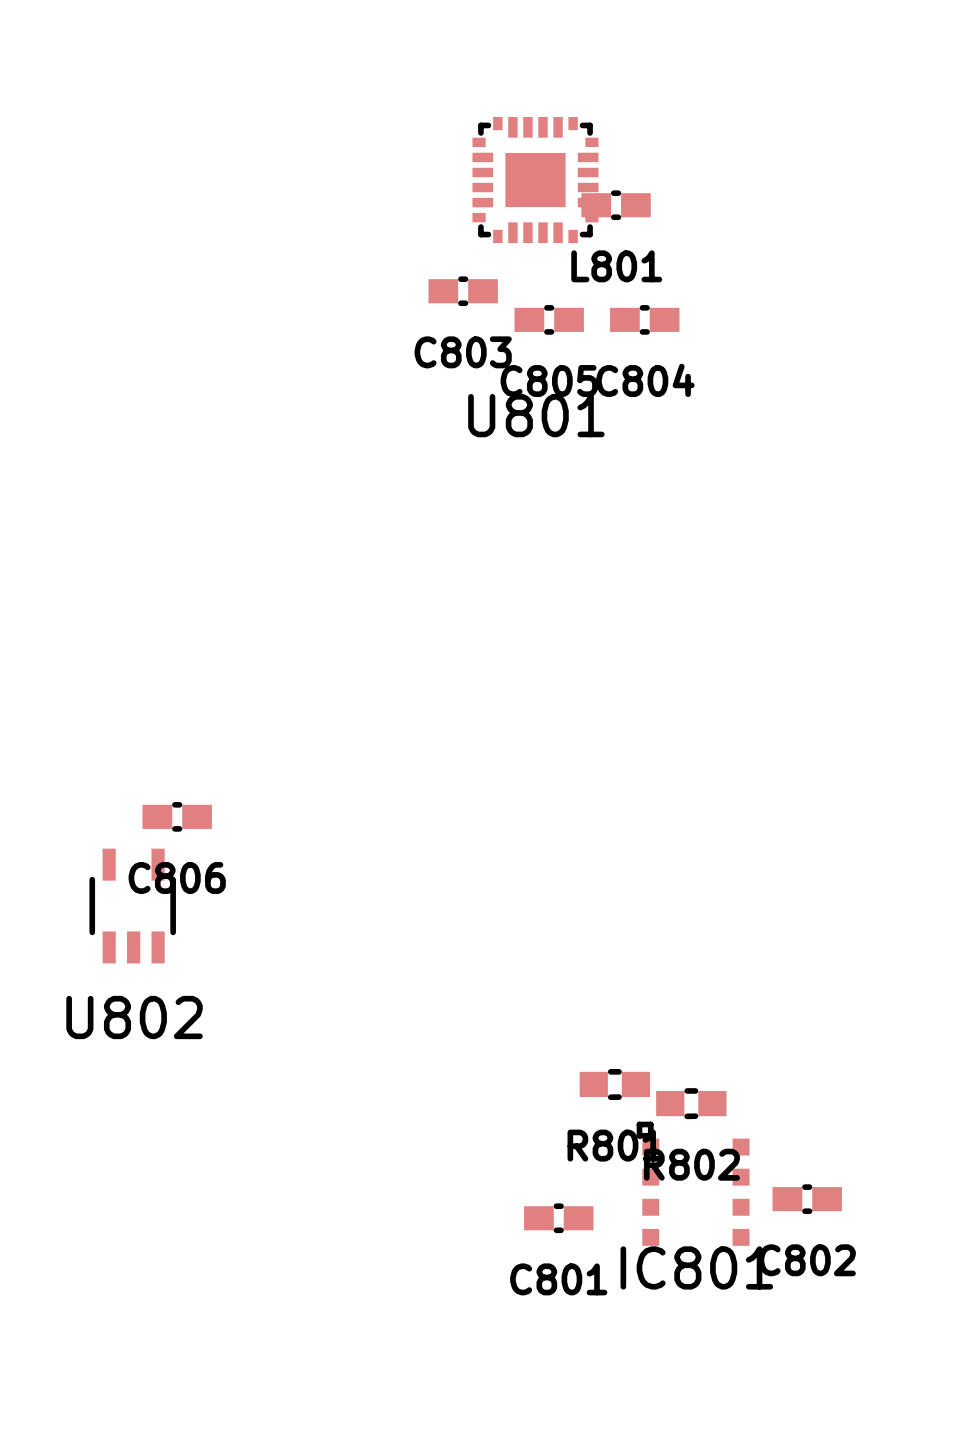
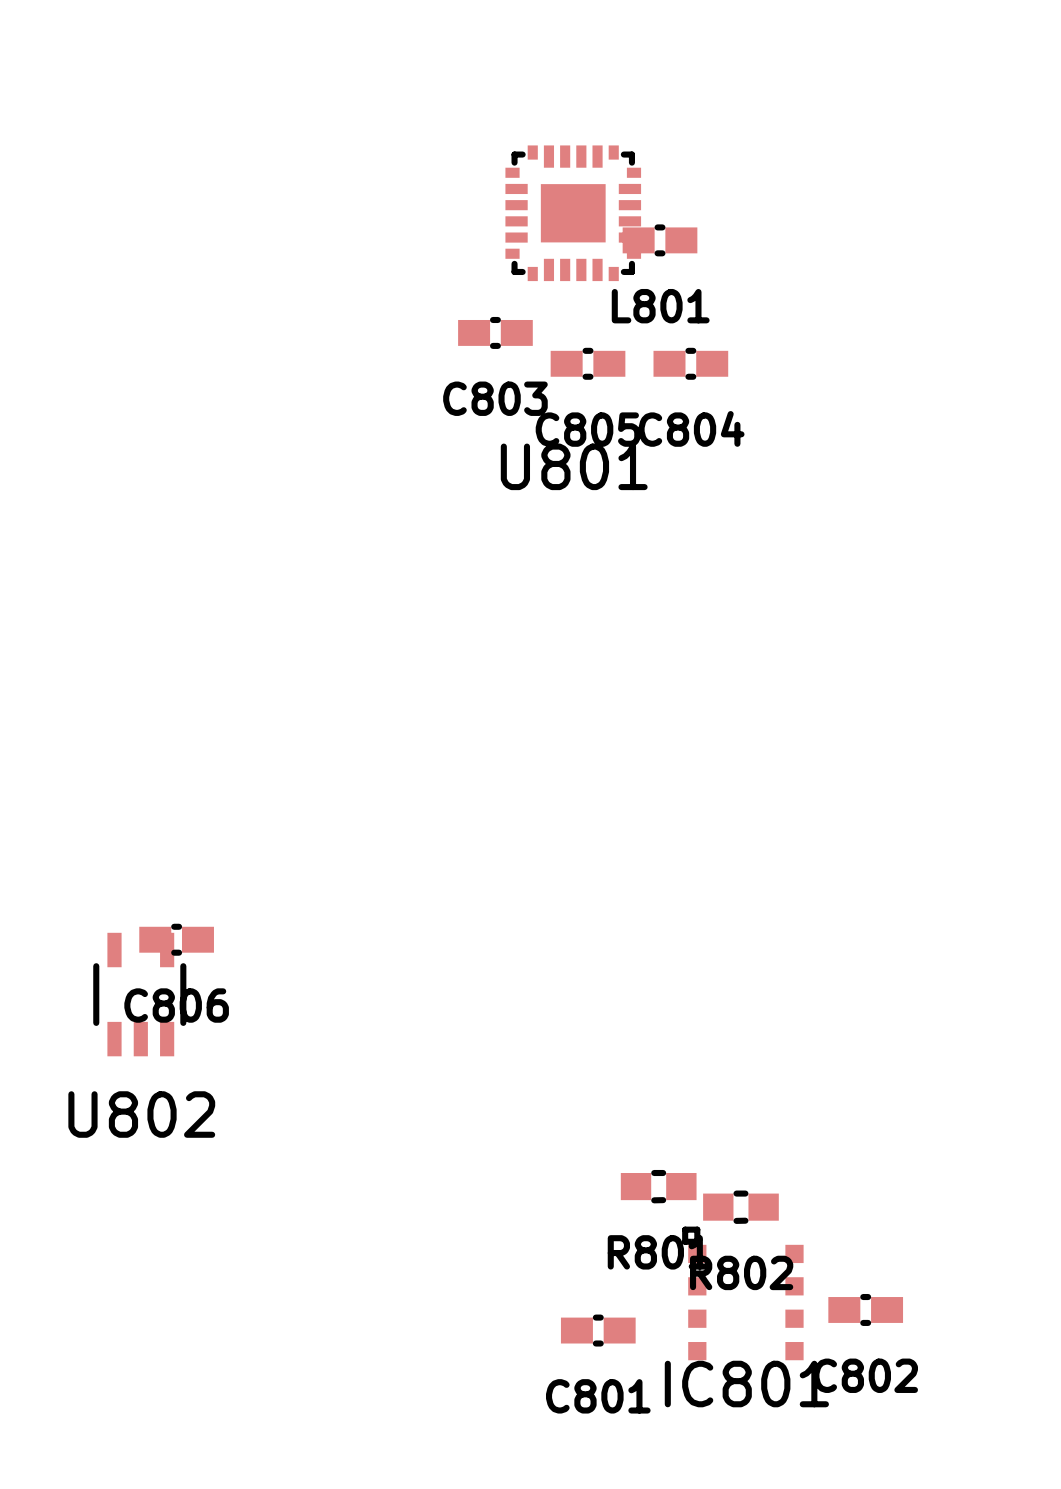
C806 position: (177, 816) -> (176, 939)

